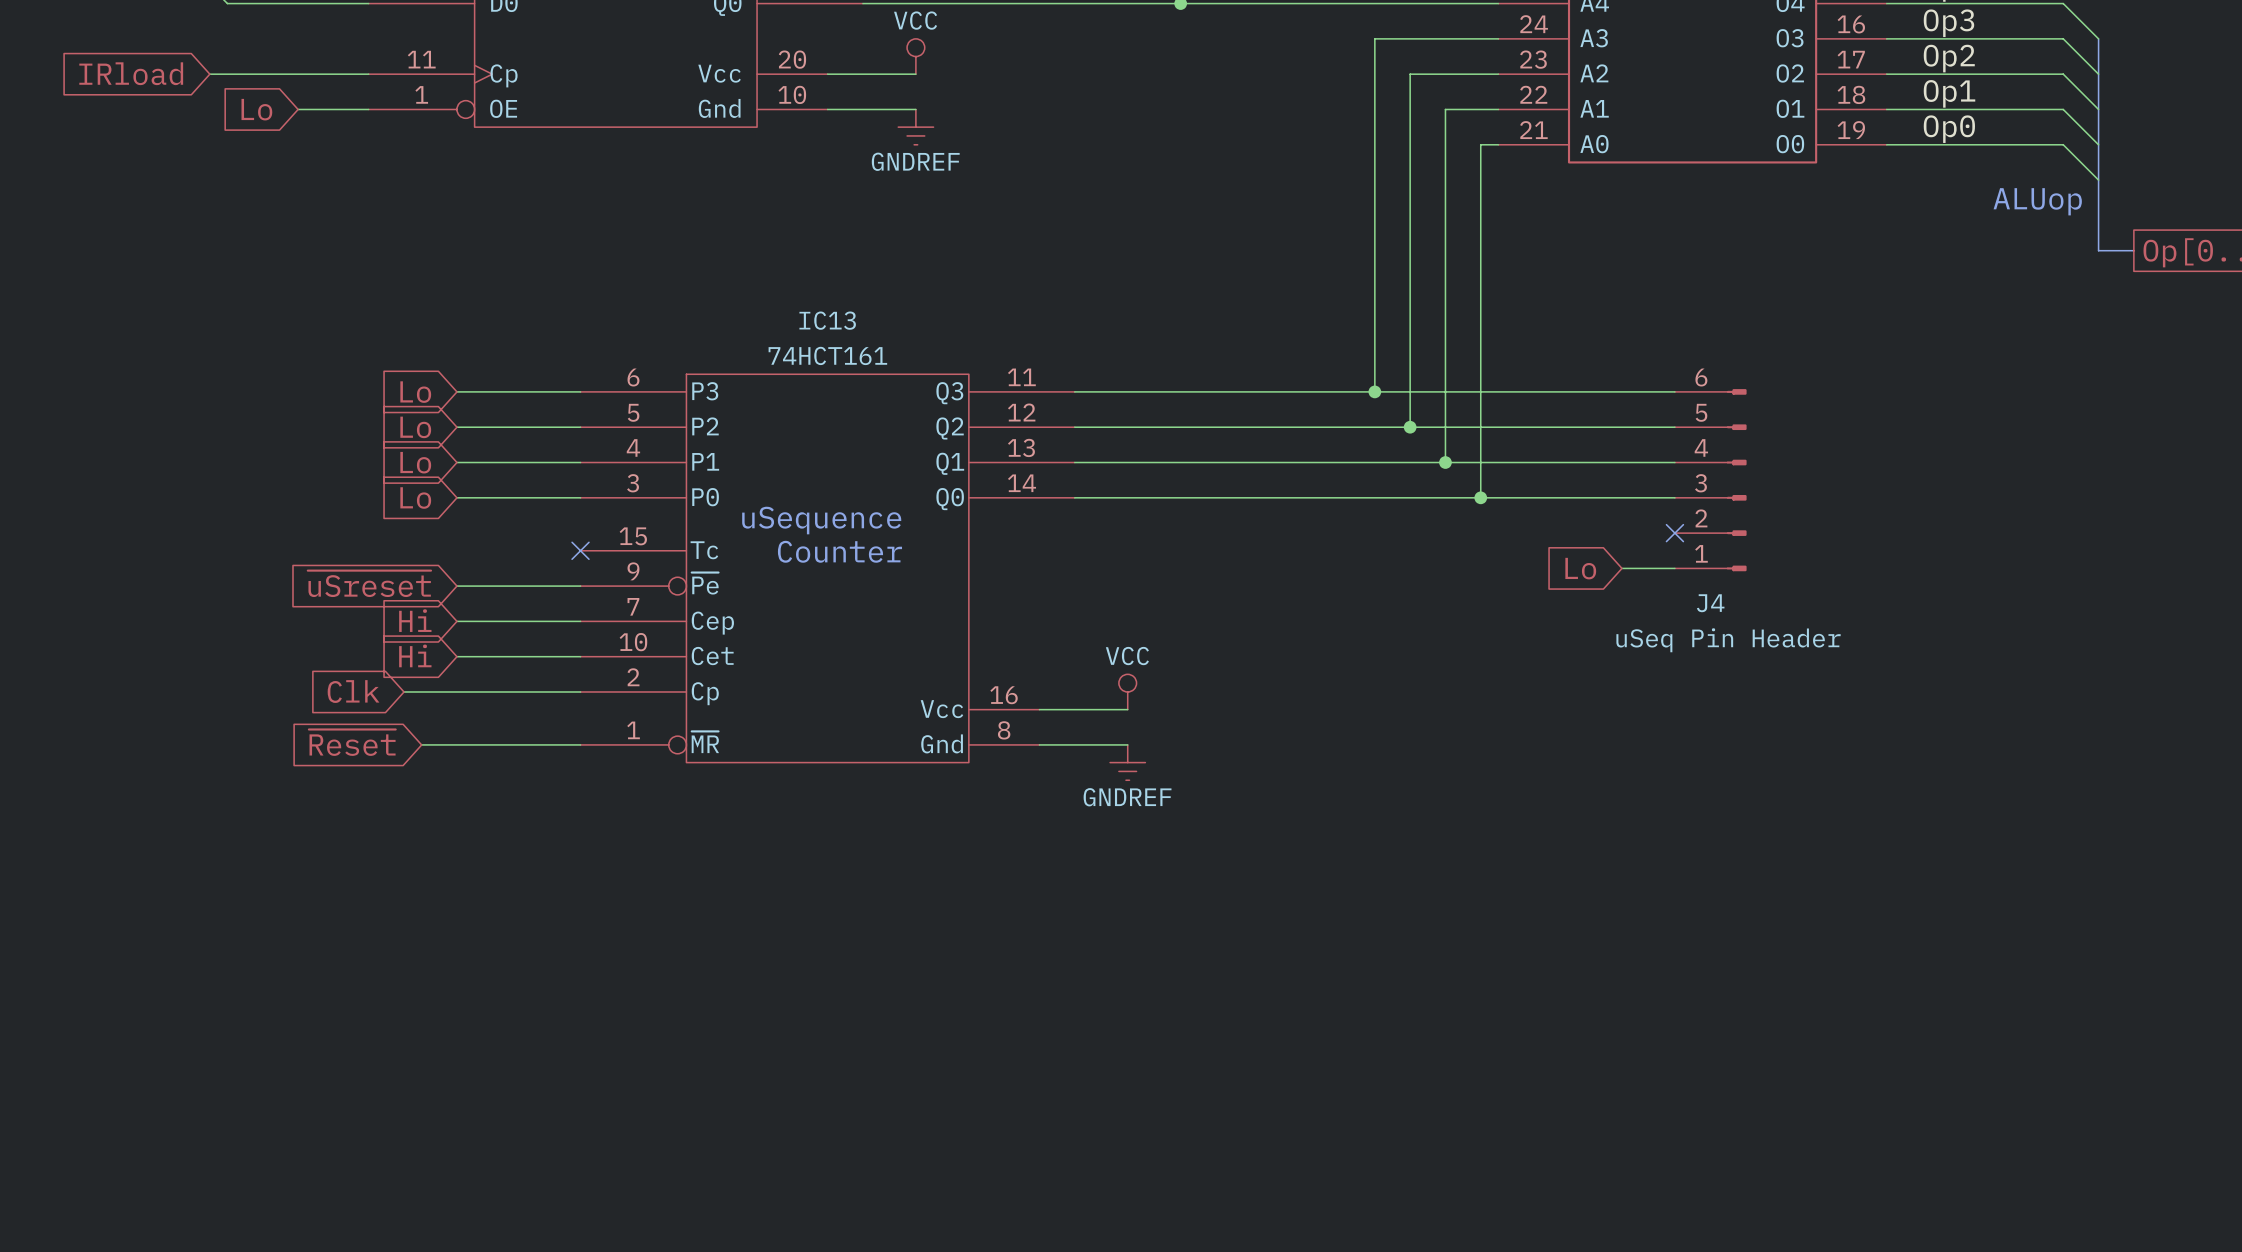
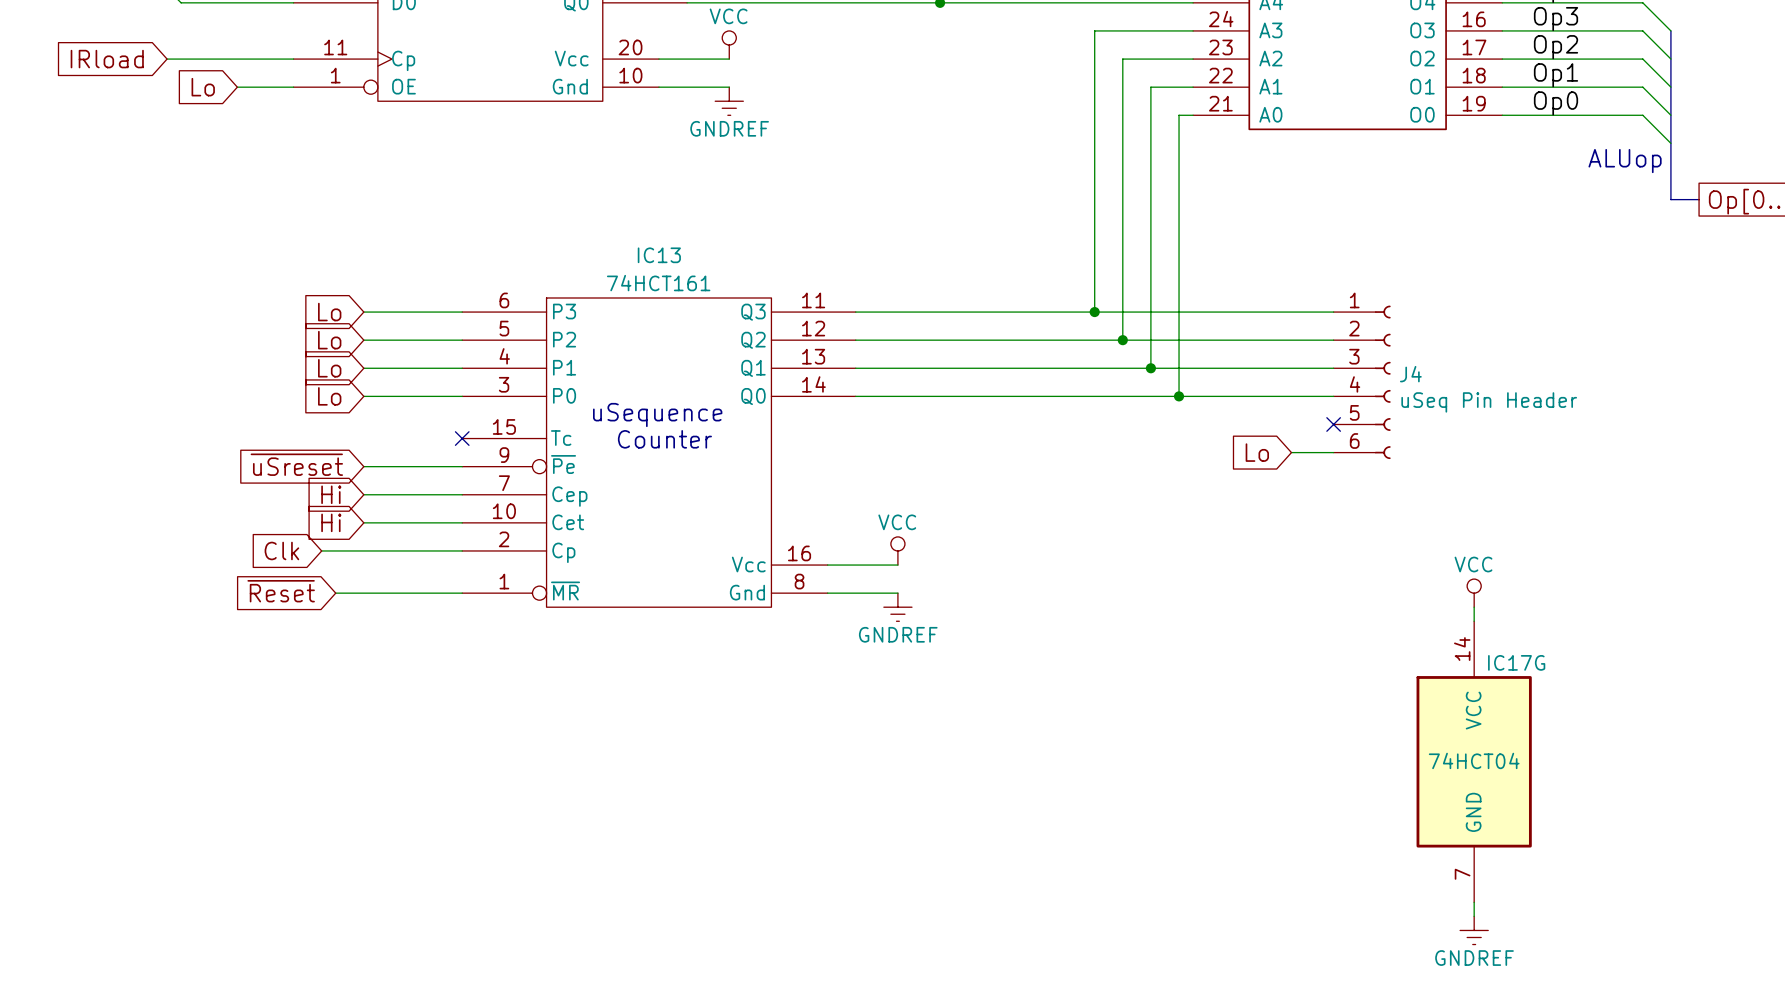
J4 symbol: [1674, 389, 1747, 572] -> [1333, 305, 1391, 460]
J4 name position: J4 (1710, 603) -> J4 (1410, 374)
J4 value position: uSeq Pin Header (1728, 640) -> uSeq Pin Header (1489, 402)
power symbol: none -> VCC (1474, 593)
wire: none -> (1474, 607) (1474, 621)
IC17G: none -> 74HCT04 (1474, 761)
wire: none -> (1474, 902) (1474, 916)
power symbol: none -> GNDREF (1474, 930)

